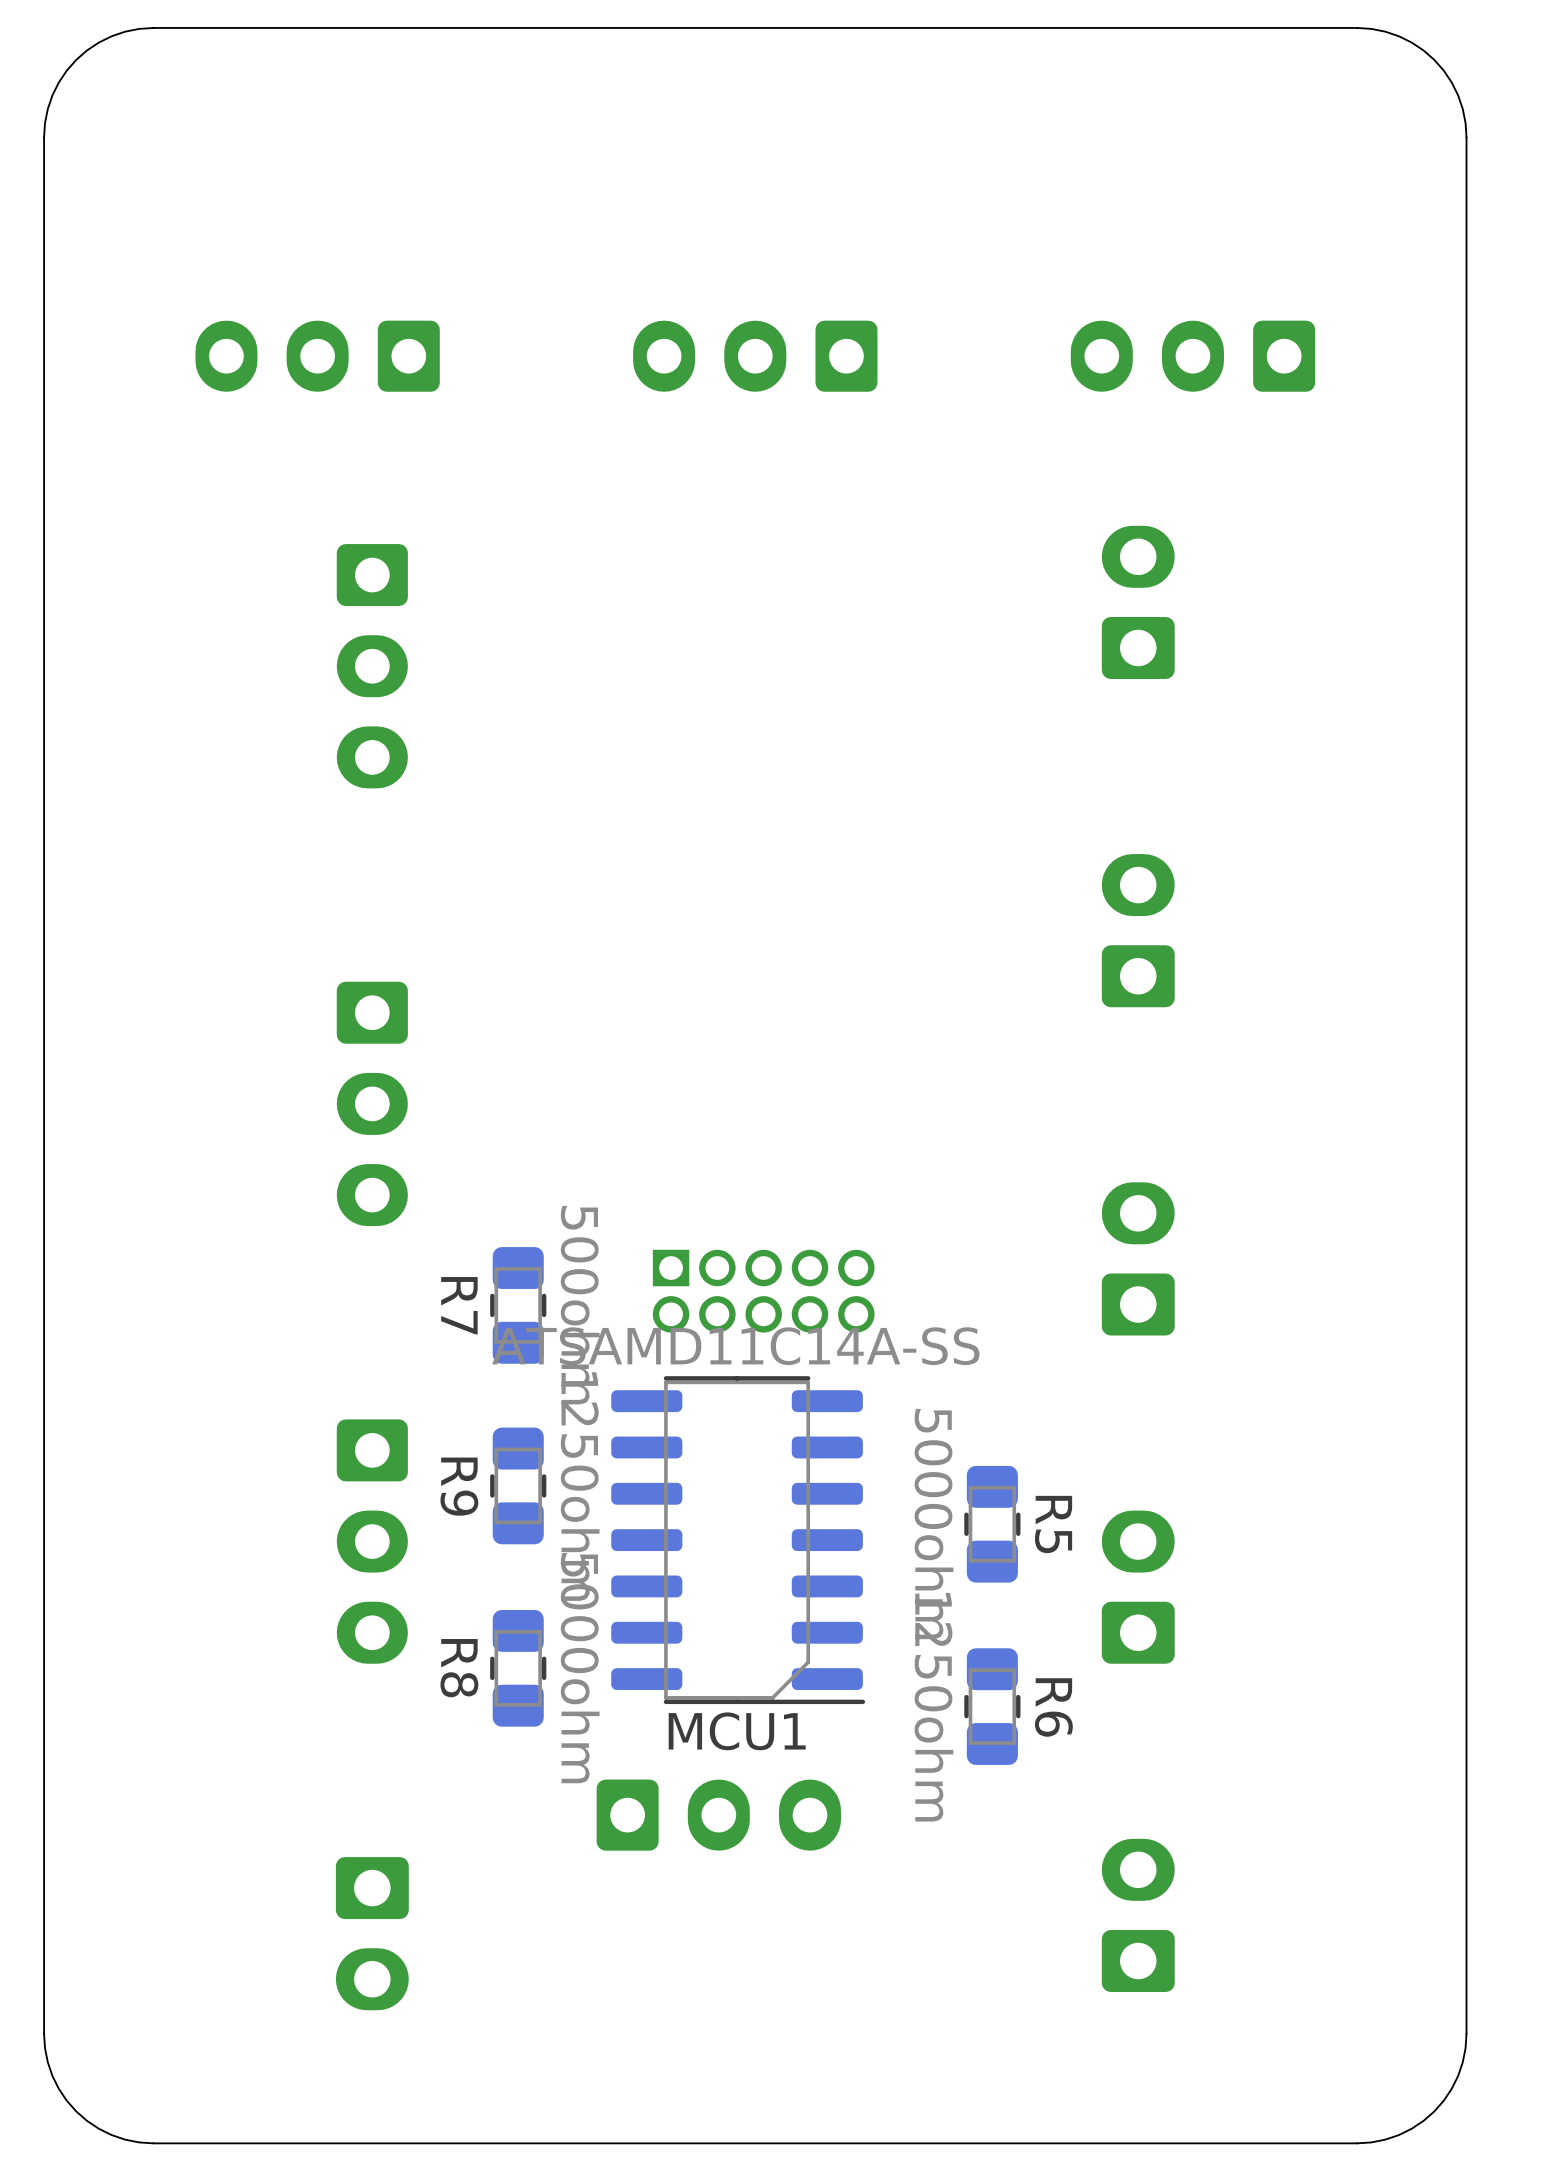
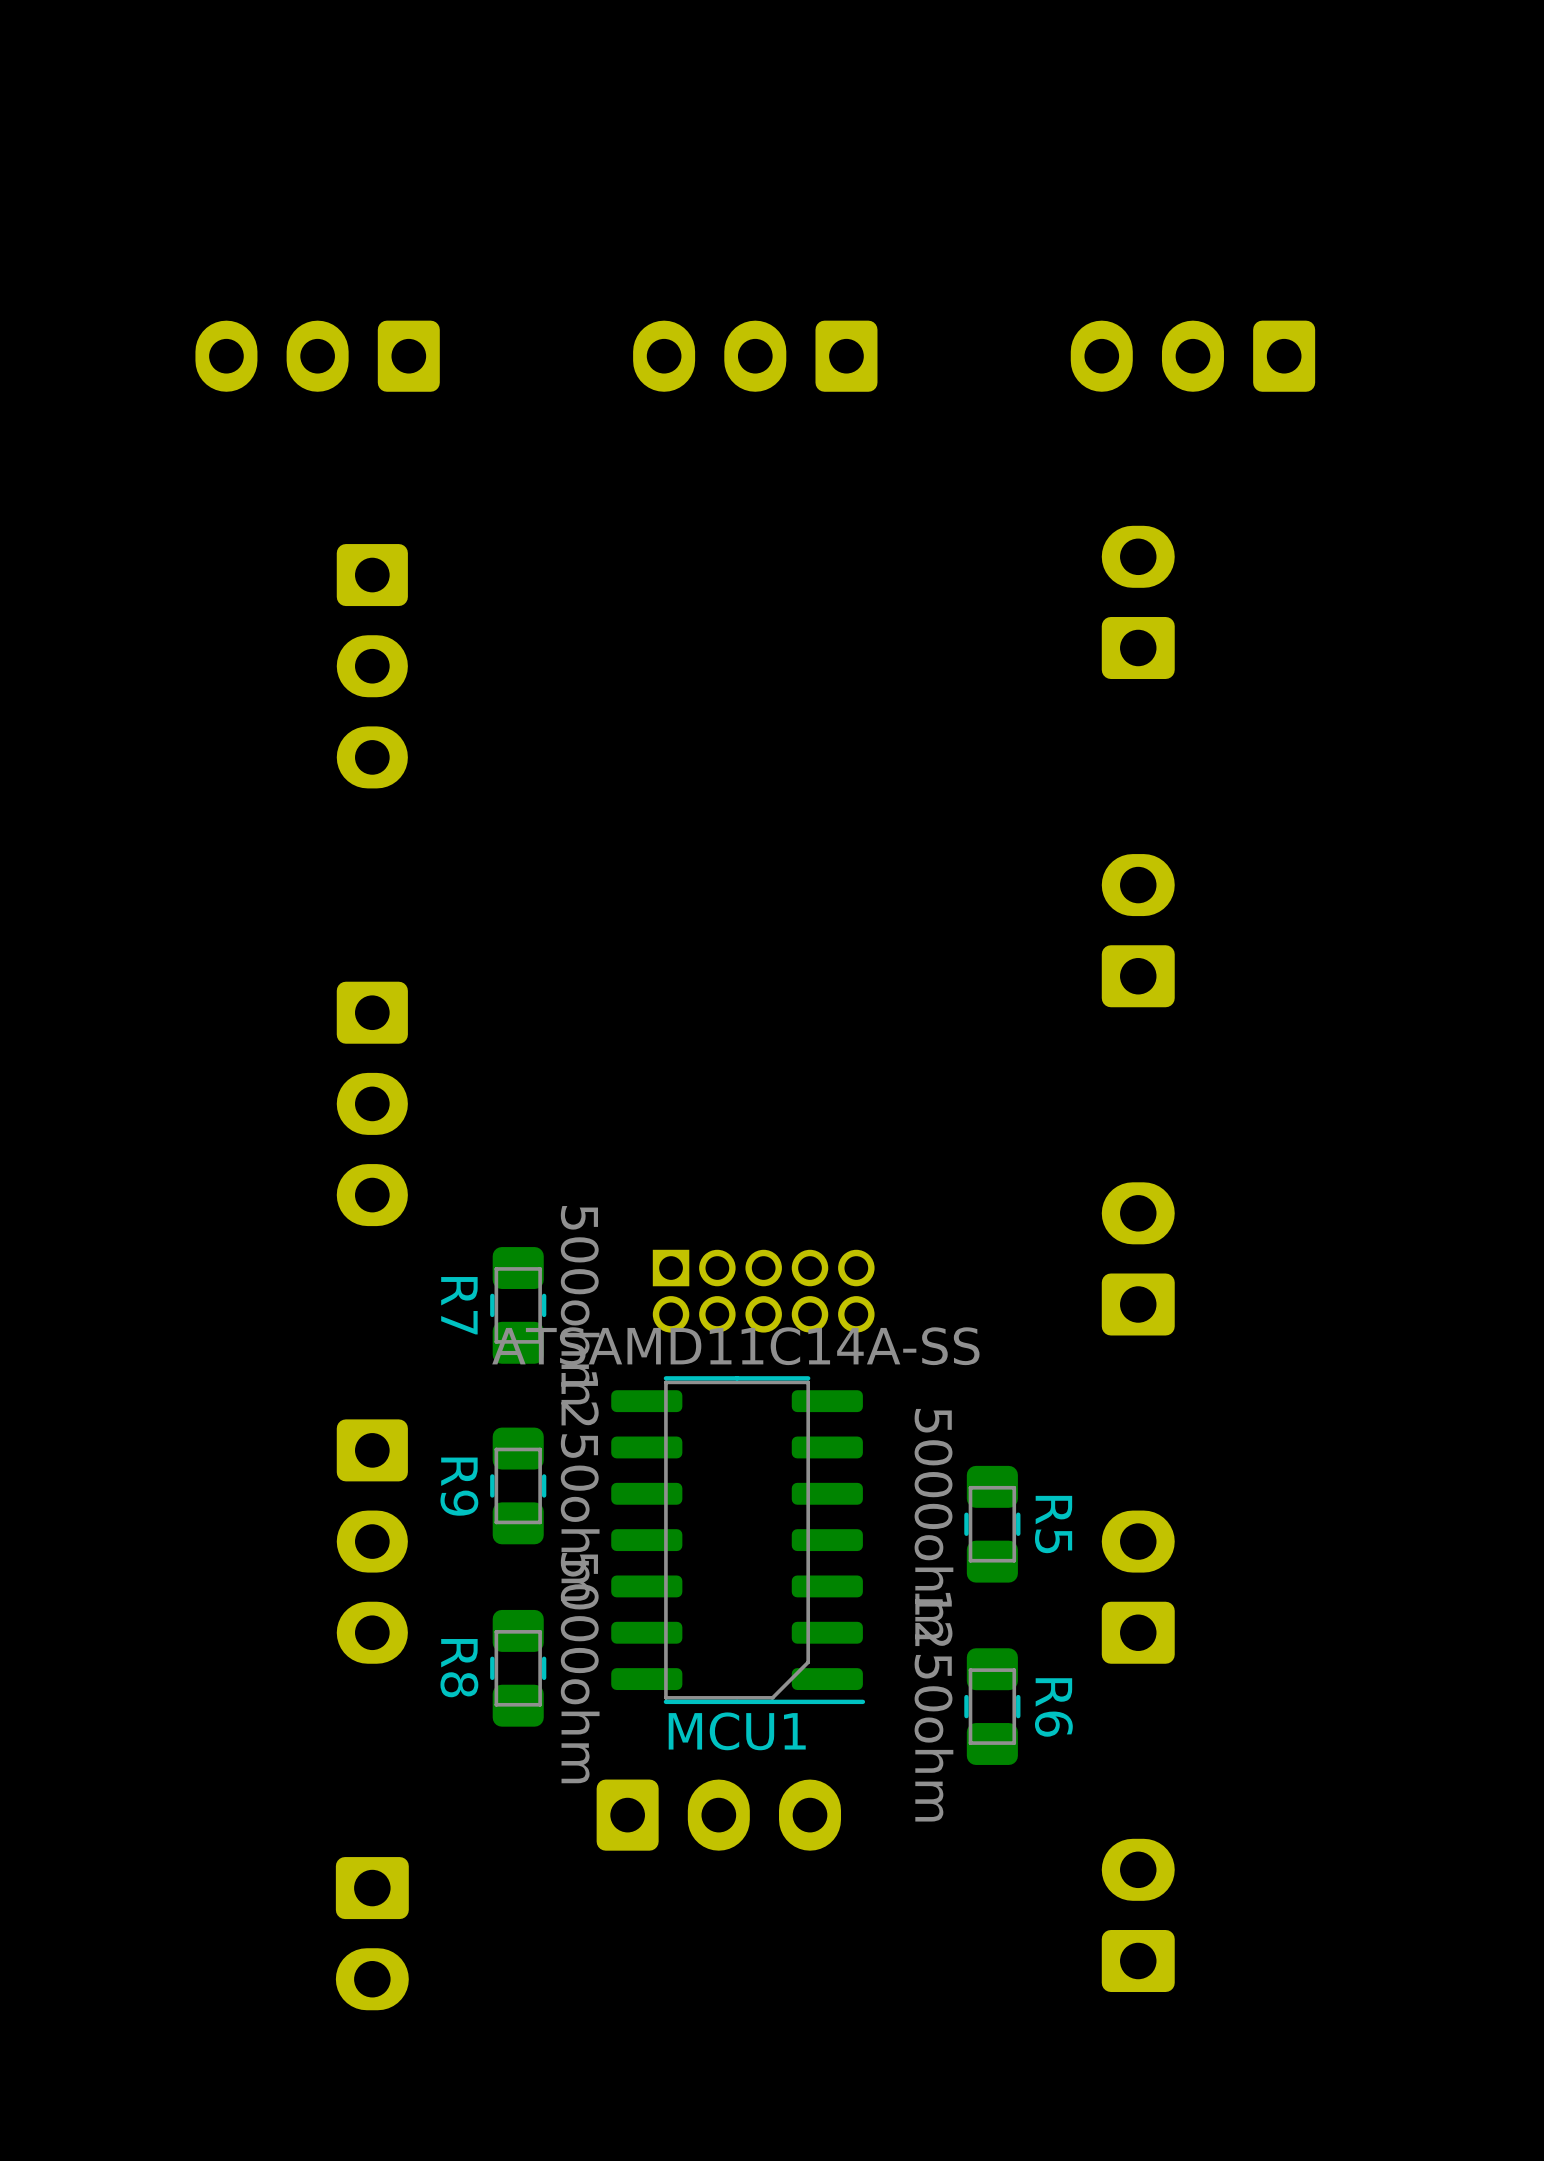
board edge: (1357, 27) (153, 27) (125, 31) (98, 42) (76, 60) (58, 82) (47, 109) (44, 137) (44, 2033) (47, 2062) (58, 2088) (76, 2111) (98, 2128) (125, 2139) (153, 2143) (1357, 2143) (1385, 2139) (1411, 2128) (1434, 2111) (1451, 2088) (1462, 2062) (1466, 2033) (1466, 137) (1465, 123) (1458, 95) (1451, 82) (1434, 60) (1411, 42) (1398, 36) (1385, 31) (1357, 27) -> none

